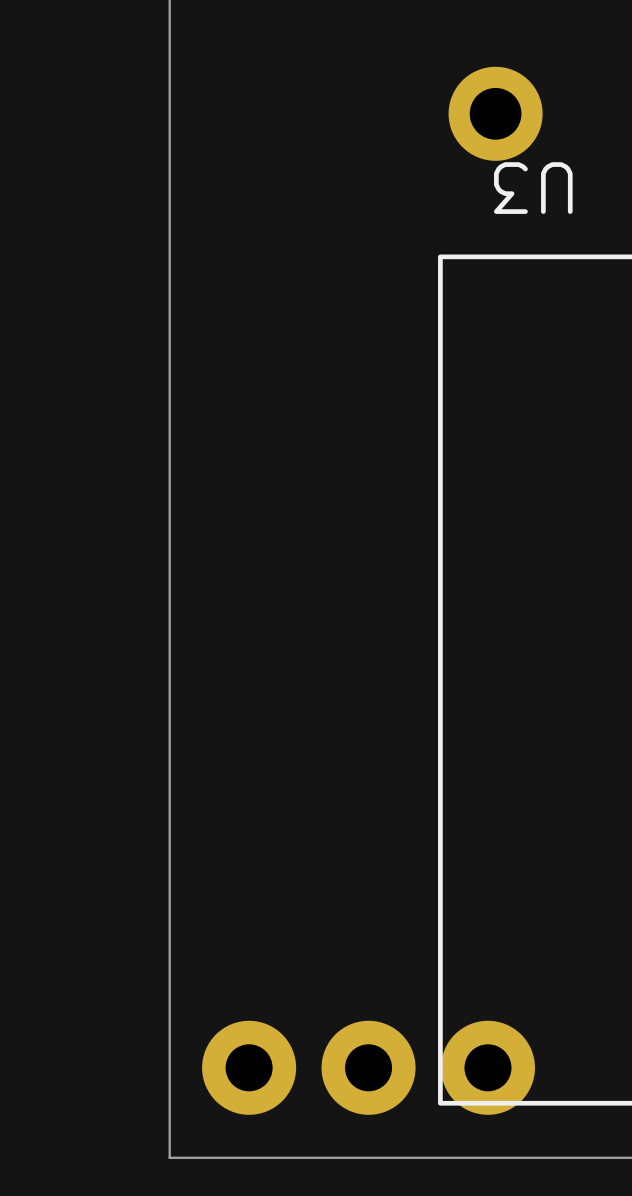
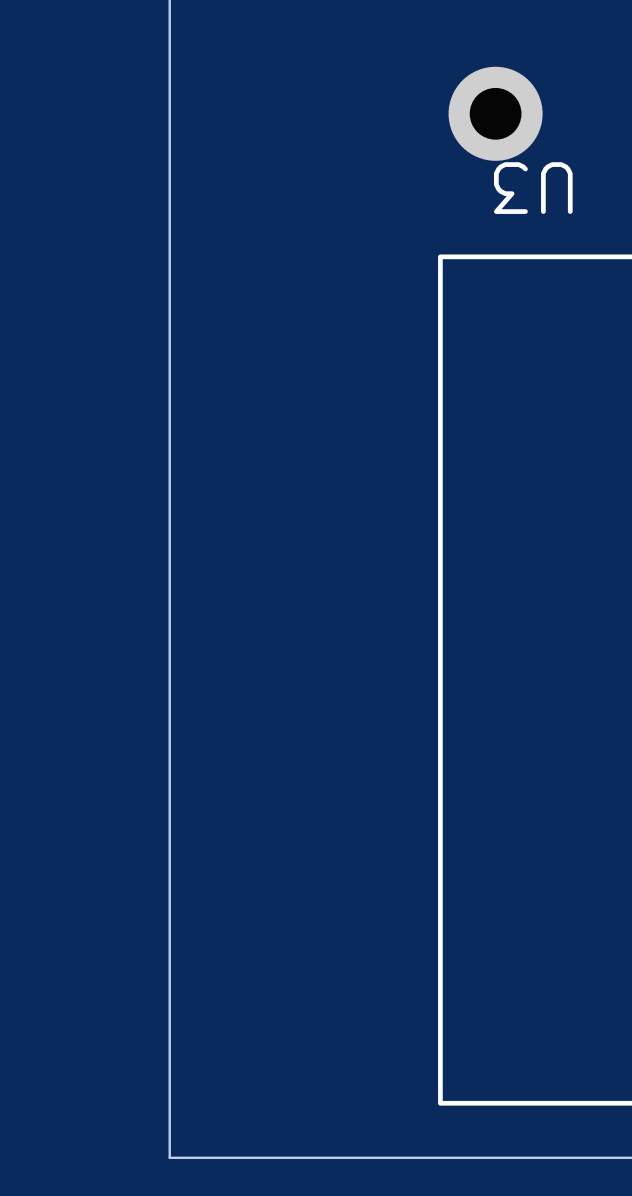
part: (368, 1067) -> none

